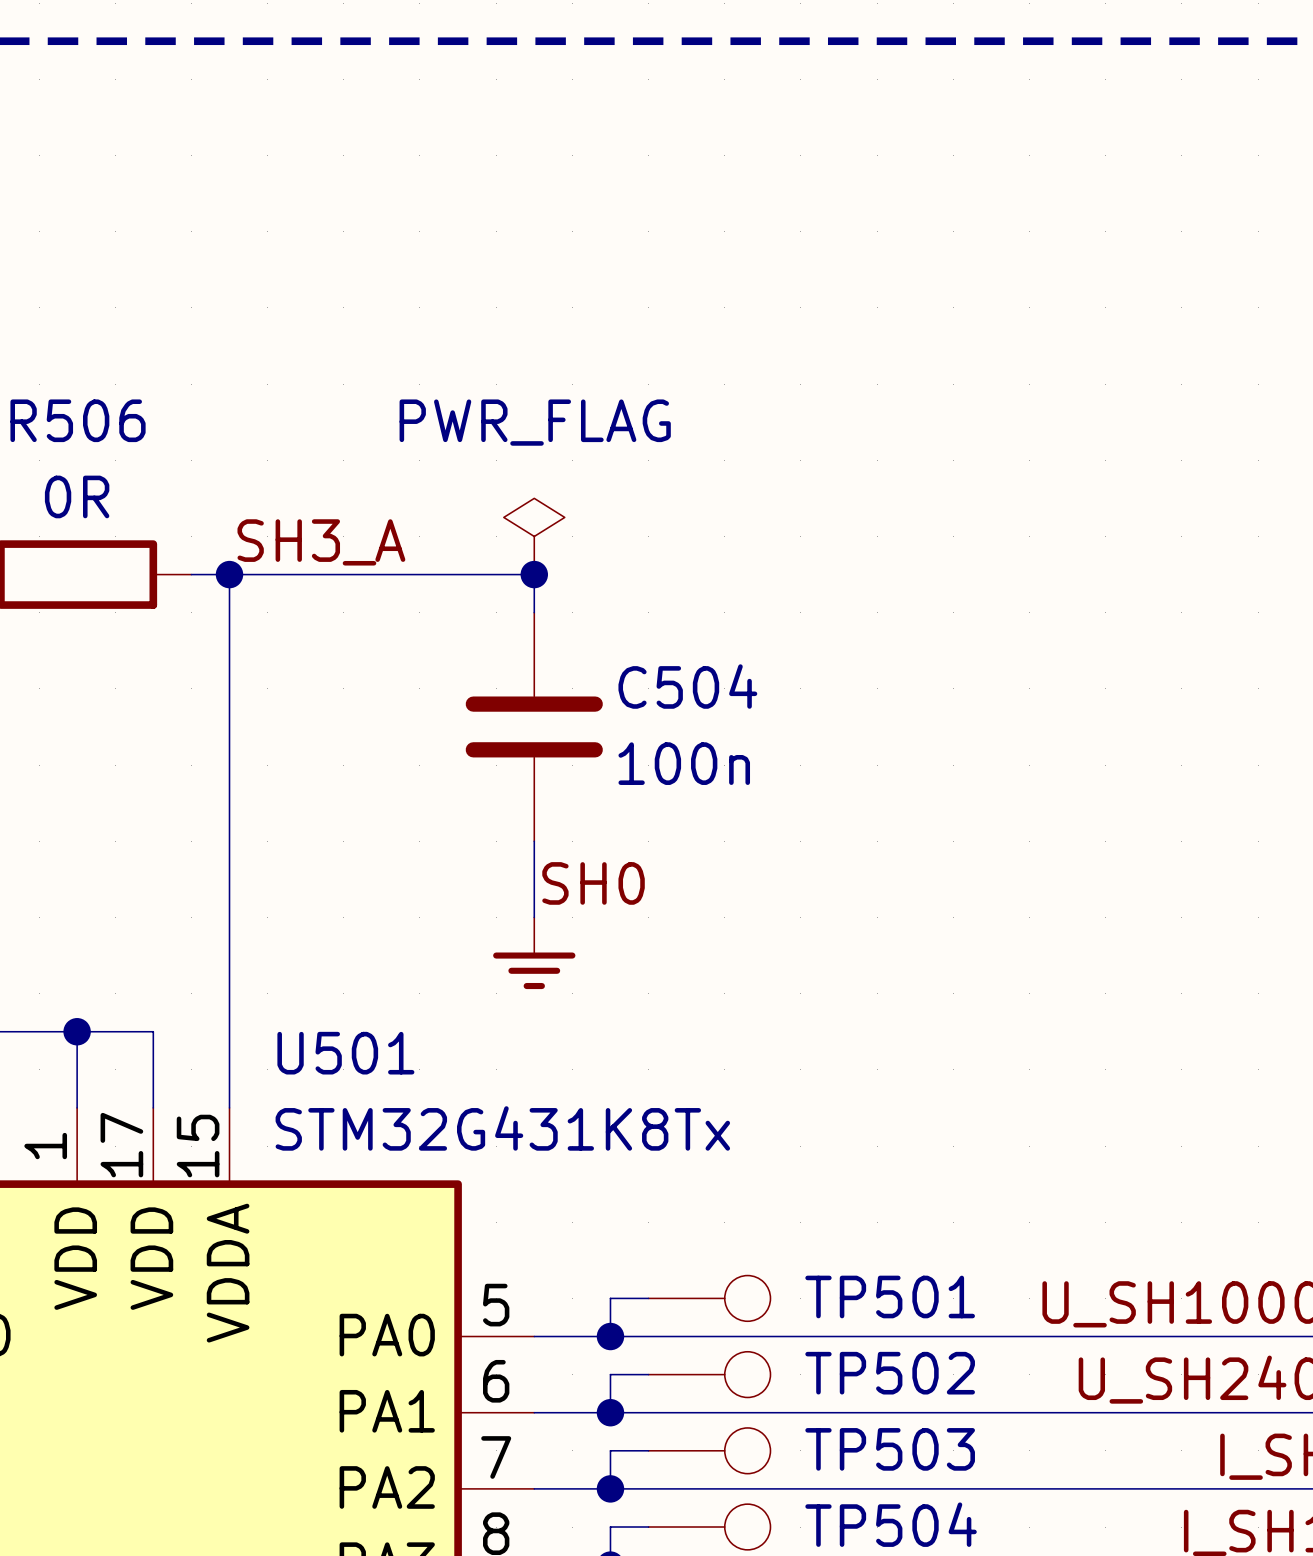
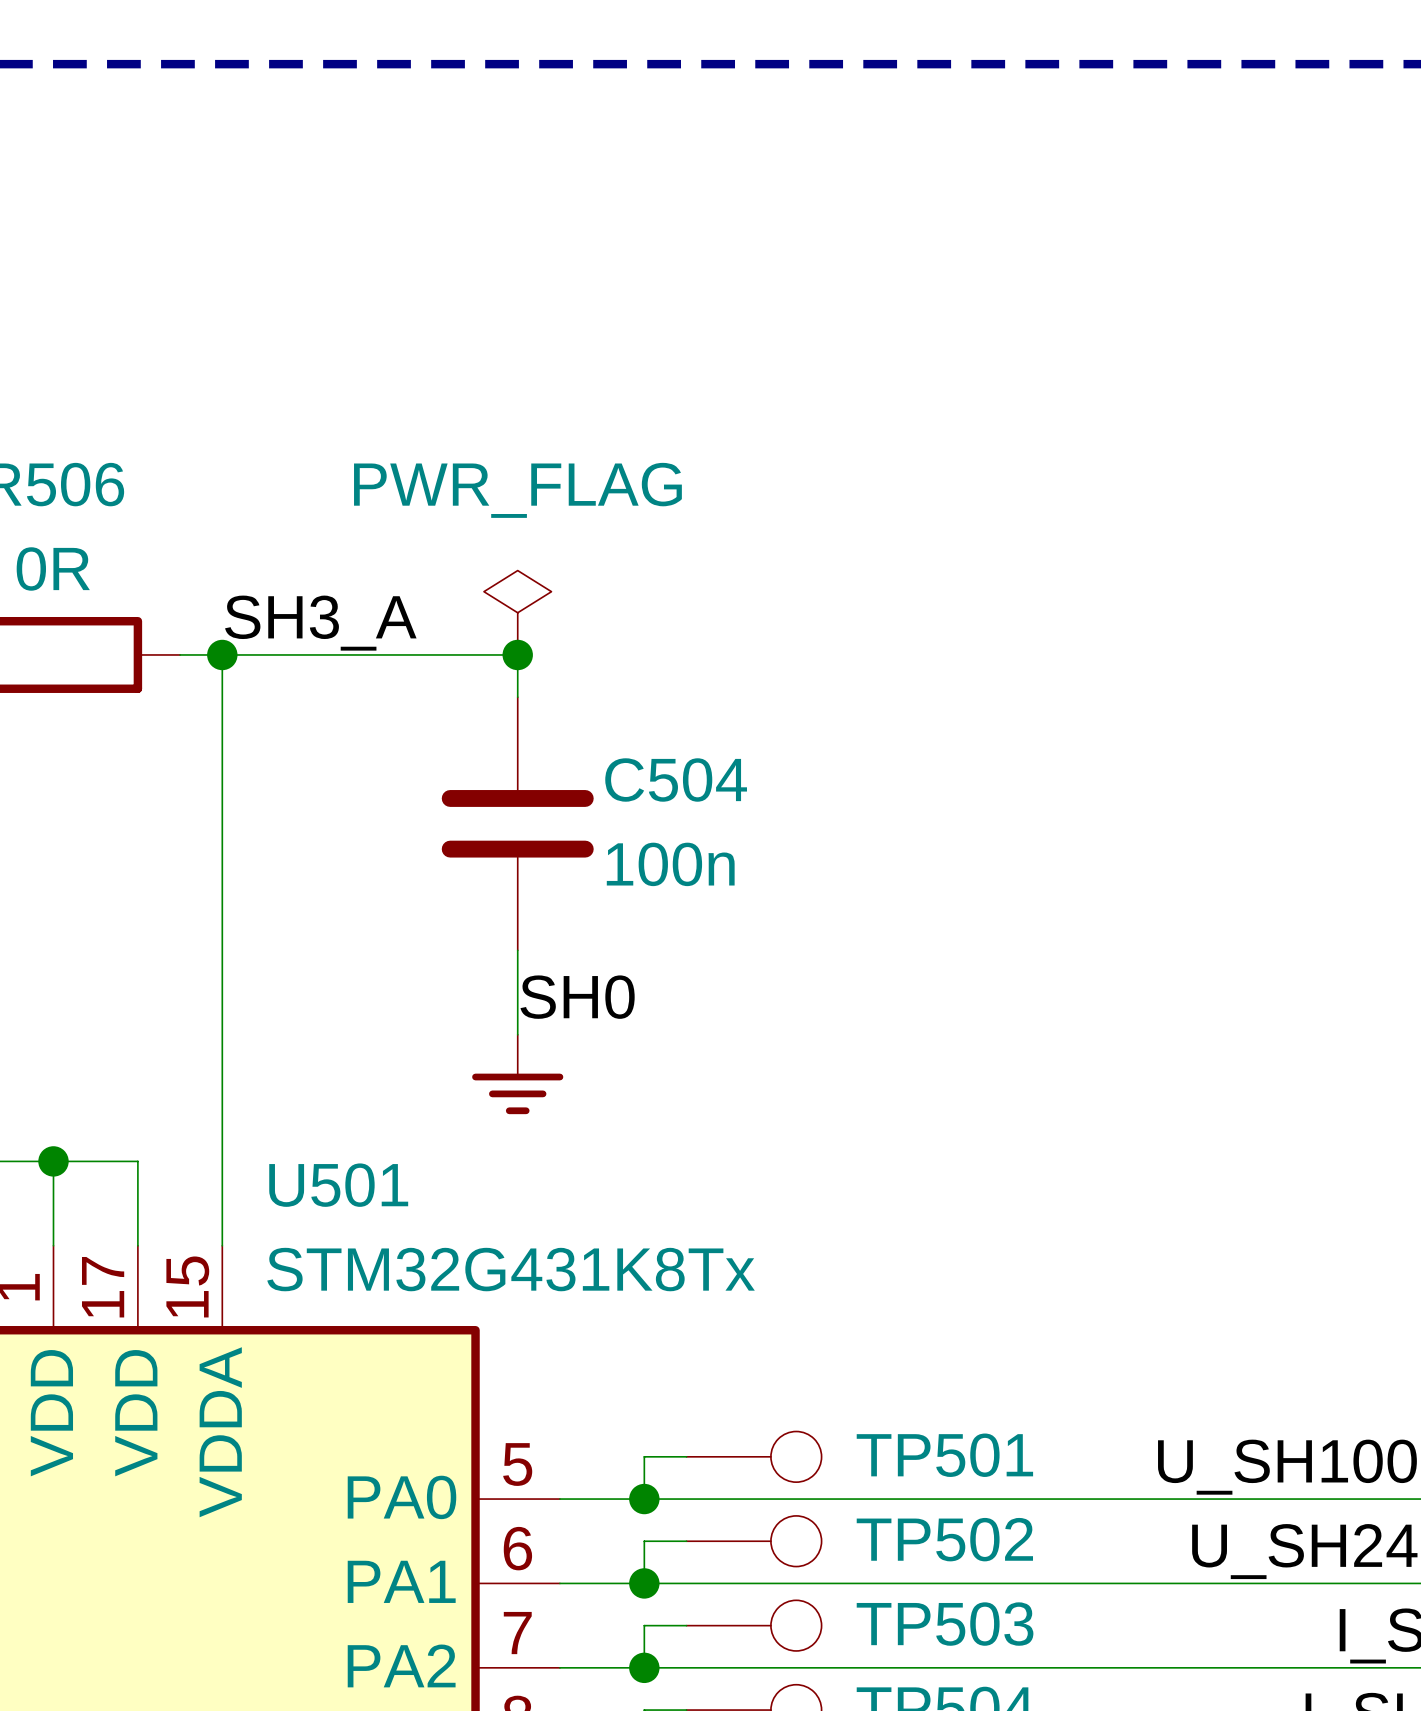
power symbol position: PWR_FLAG (534, 536) -> PWR_FLAG (517, 612)
wire: (496, 574) (534, 574) (534, 612) -> (517, 654) (517, 697)
junction position: (534, 574) -> (517, 654)
C504 position: (534, 726) -> (517, 823)
wire: (534, 841) (534, 917) -> (517, 950) (517, 1034)
label position: SH0 (593, 883) -> SH0 (577, 997)
part position: (534, 953) -> (517, 1074)

